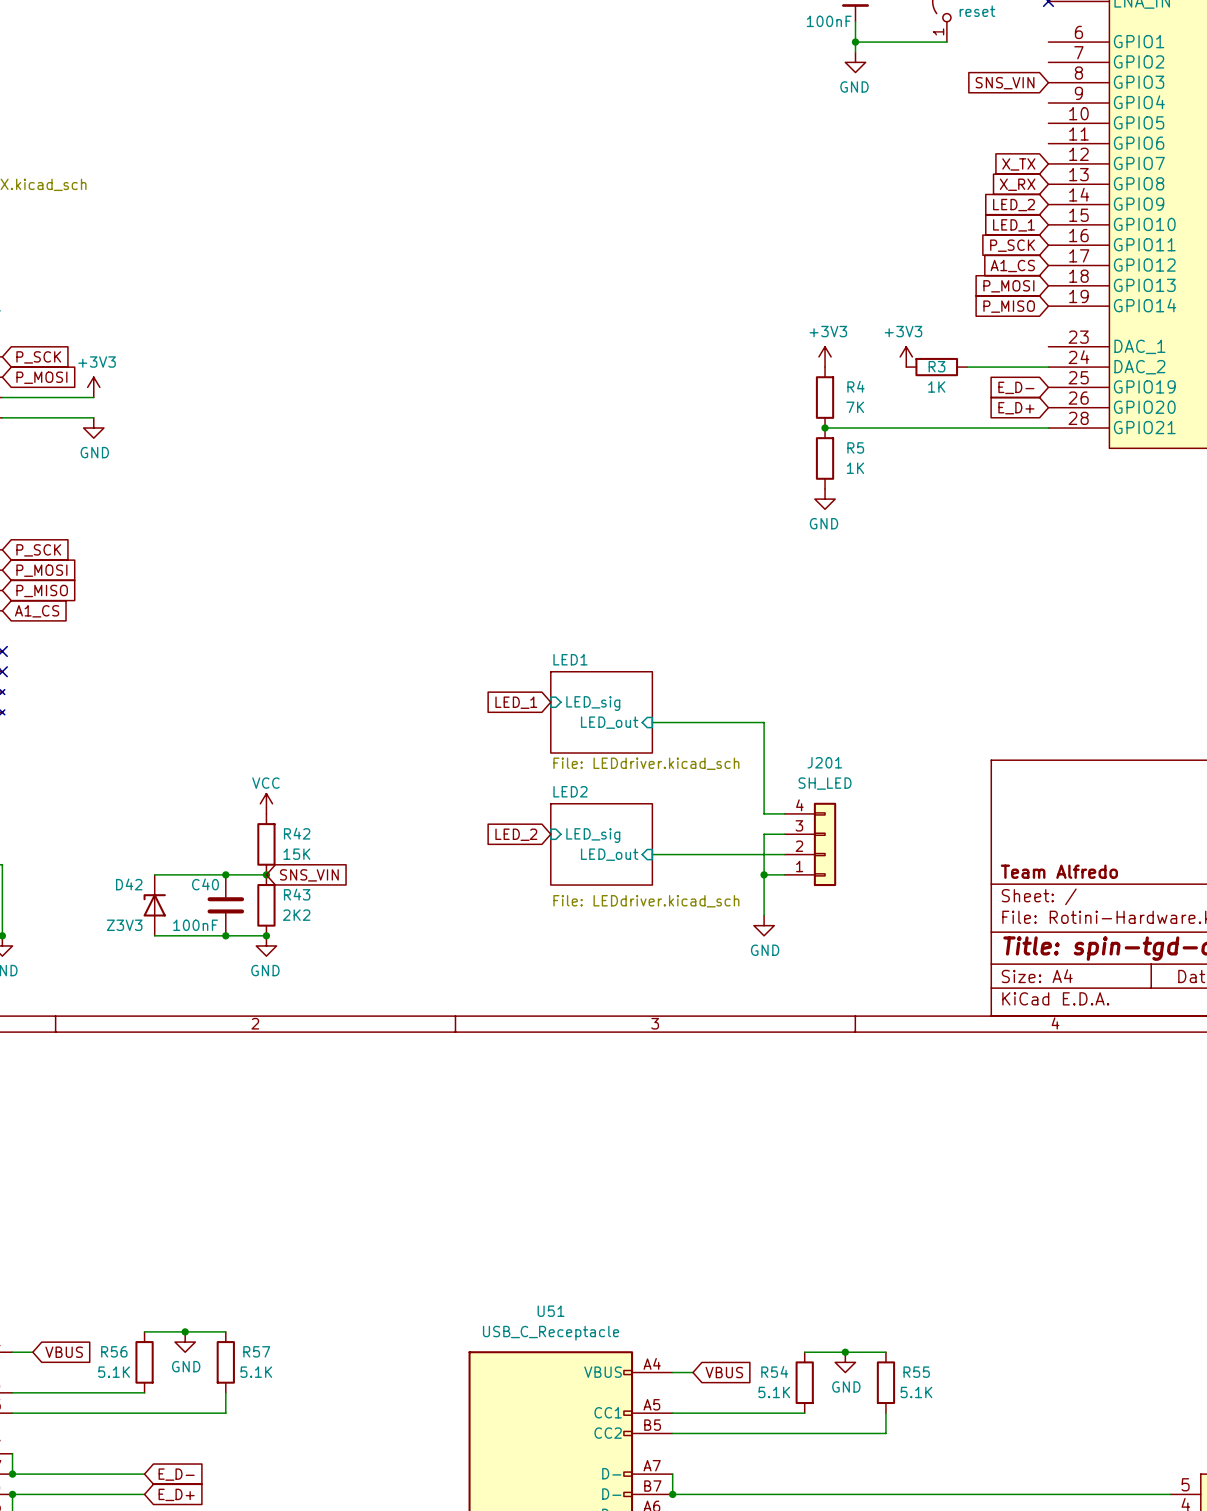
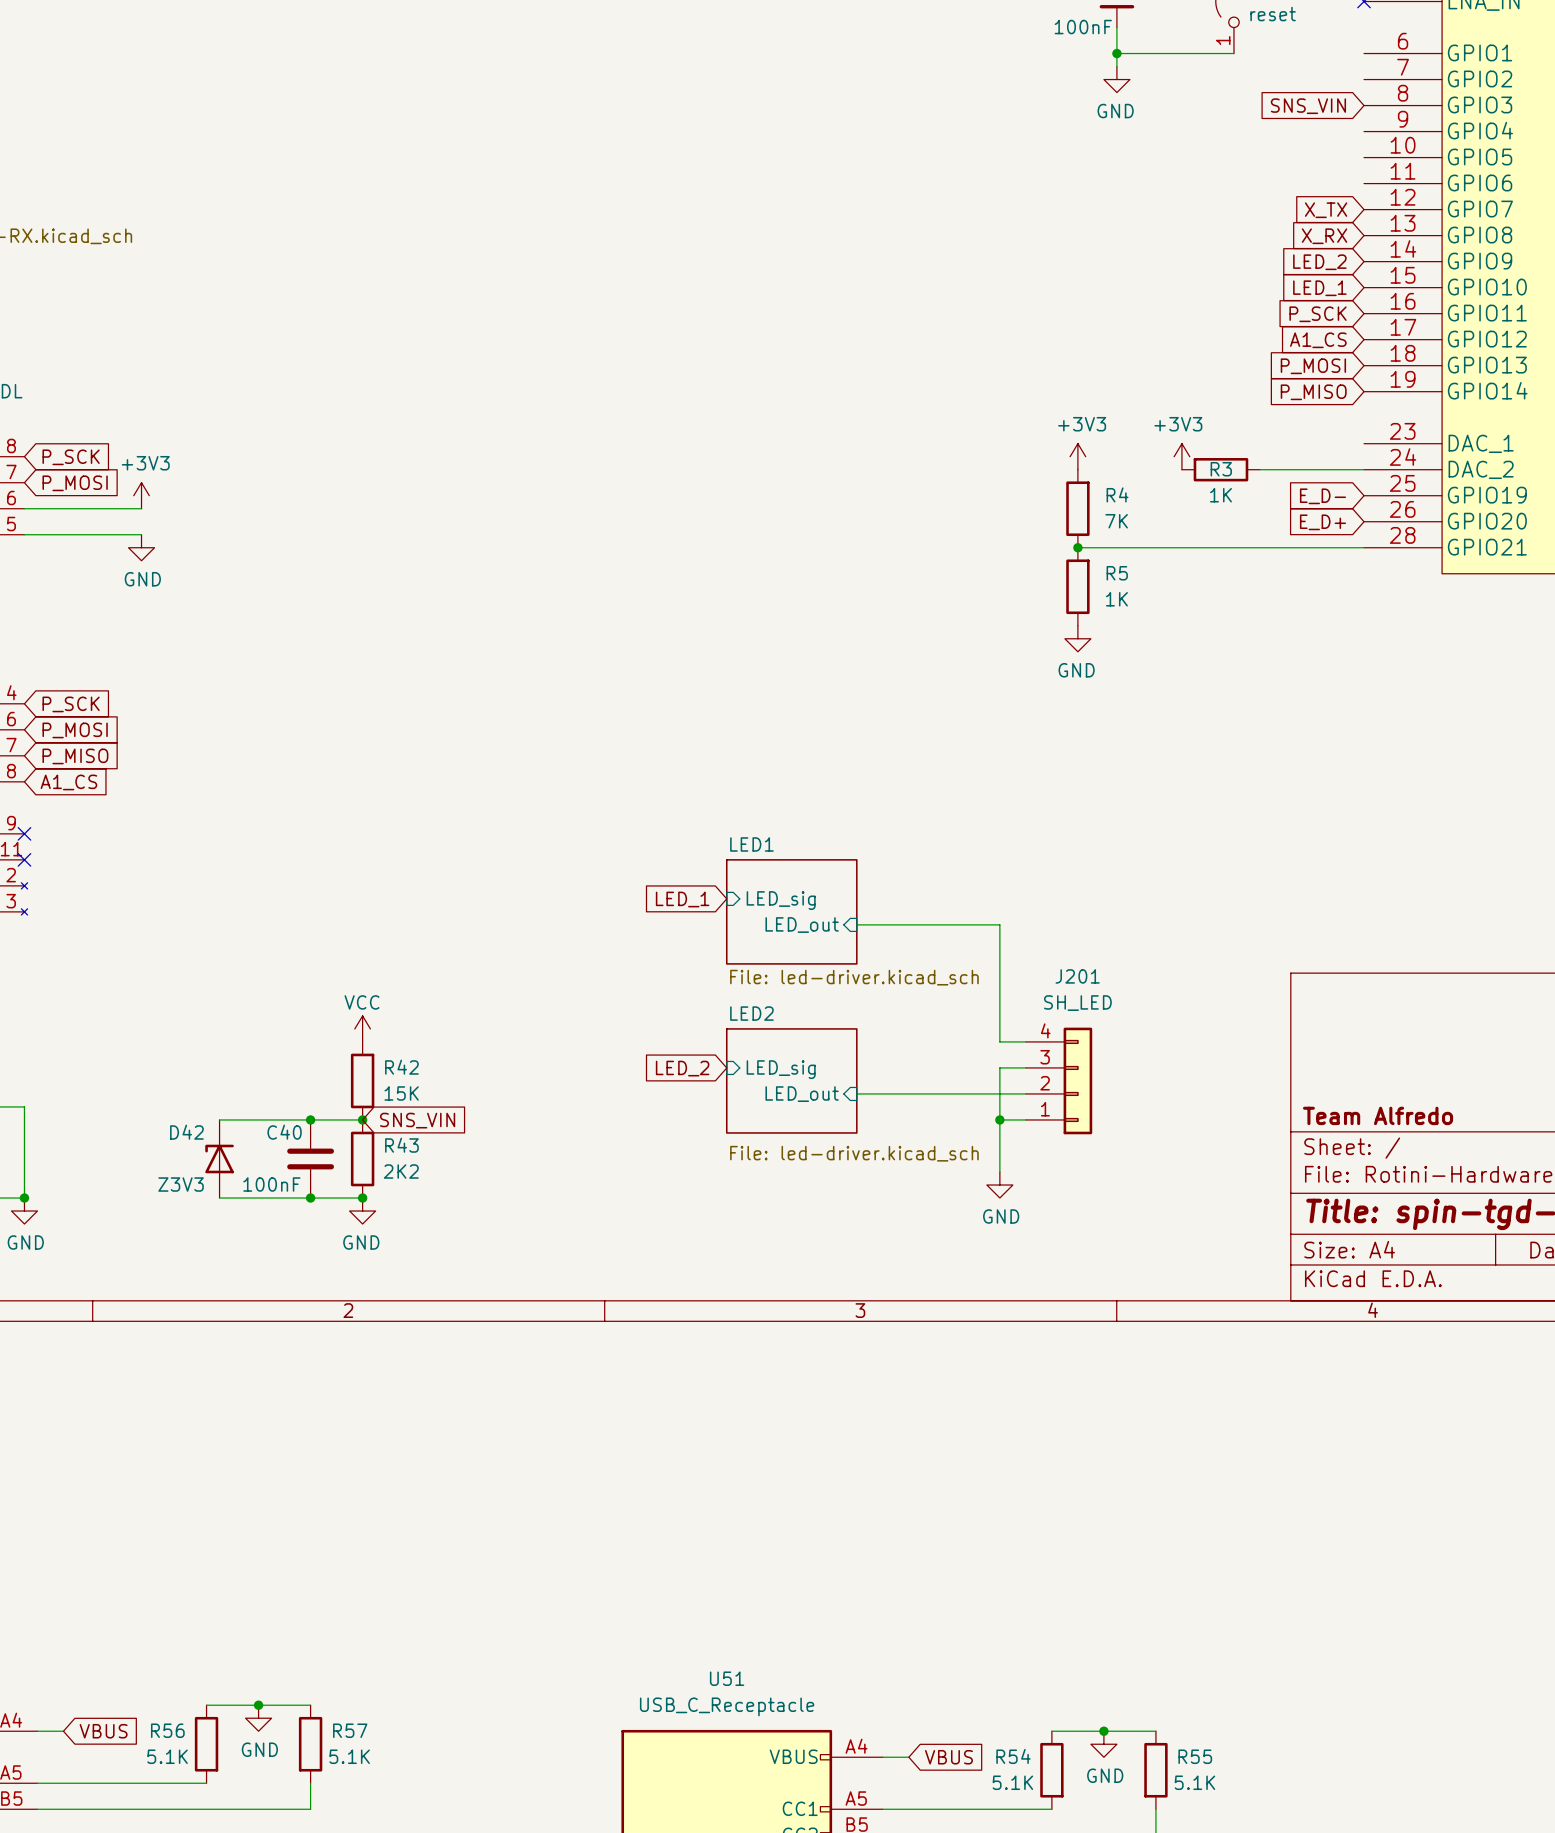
sheet LED1 value: File: LEDdriver.kicad_sch (646, 763) -> File: led-driver.kicad_sch (854, 977)
sheet LED2 value: File: LEDdriver.kicad_sch (646, 901) -> File: led-driver.kicad_sch (854, 1153)

